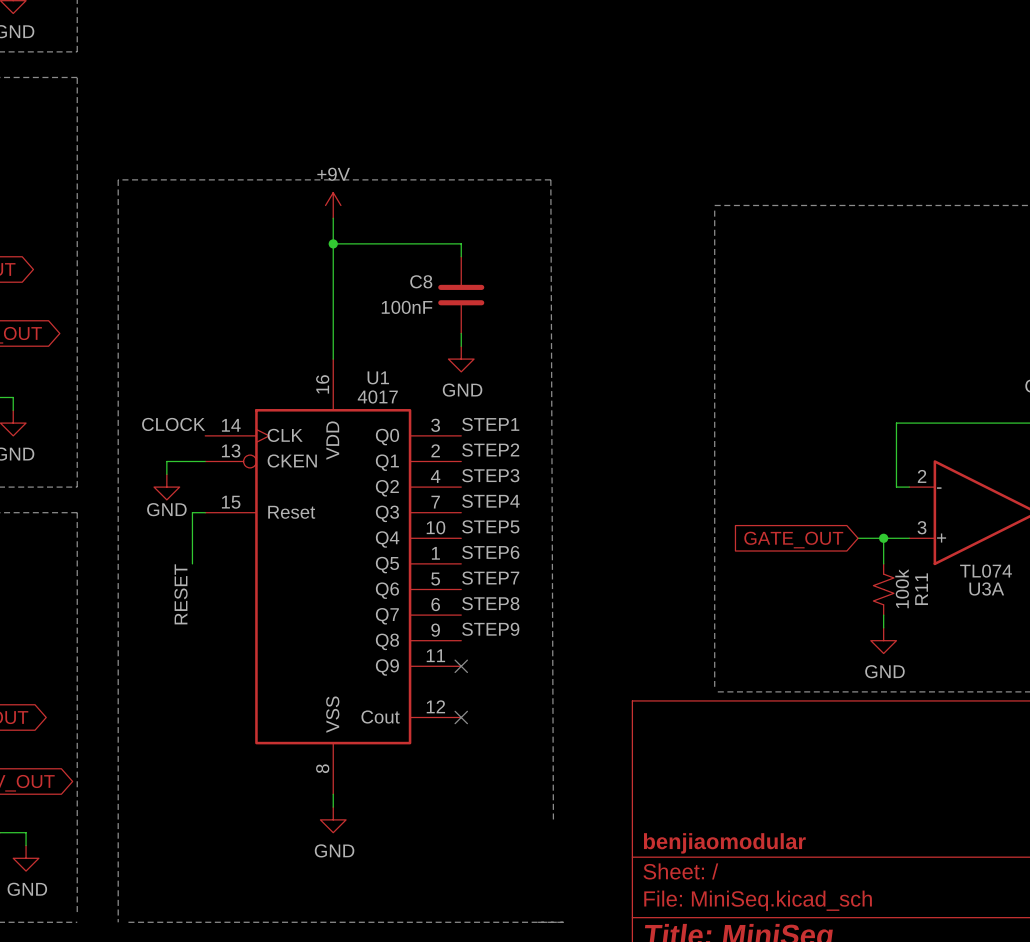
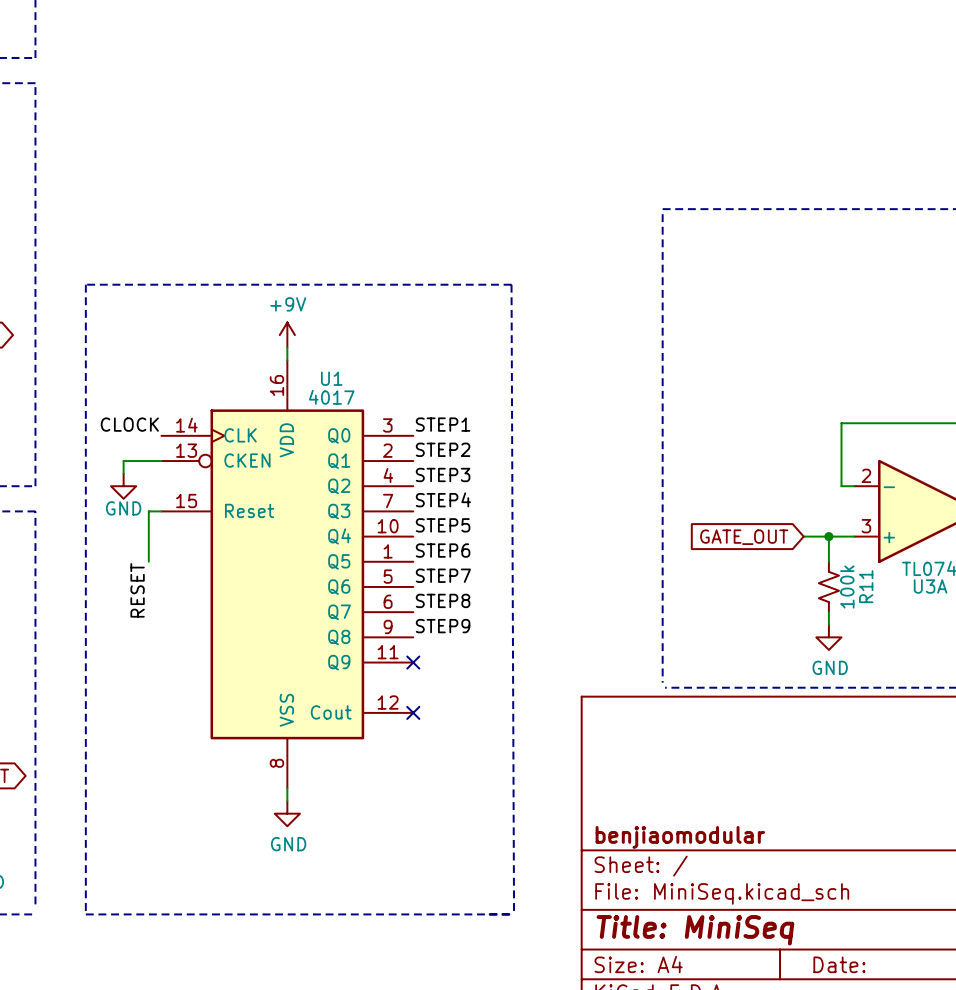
power symbol position: +9V (333, 205) -> +9V (287, 335)
wire: (333, 218) (333, 346) -> none
wire: (333, 243) (461, 243) (461, 256) -> none
junction: (333, 243) -> none
C8: 100nF (461, 295) -> none
wire: (461, 333) (461, 346) -> none
power symbol: GND (461, 359) -> none
line: (553, 819) (550, 179) (118, 179) (118, 922) -> none
line: none -> (85, 914) (85, 284) (511, 284) (514, 914)

